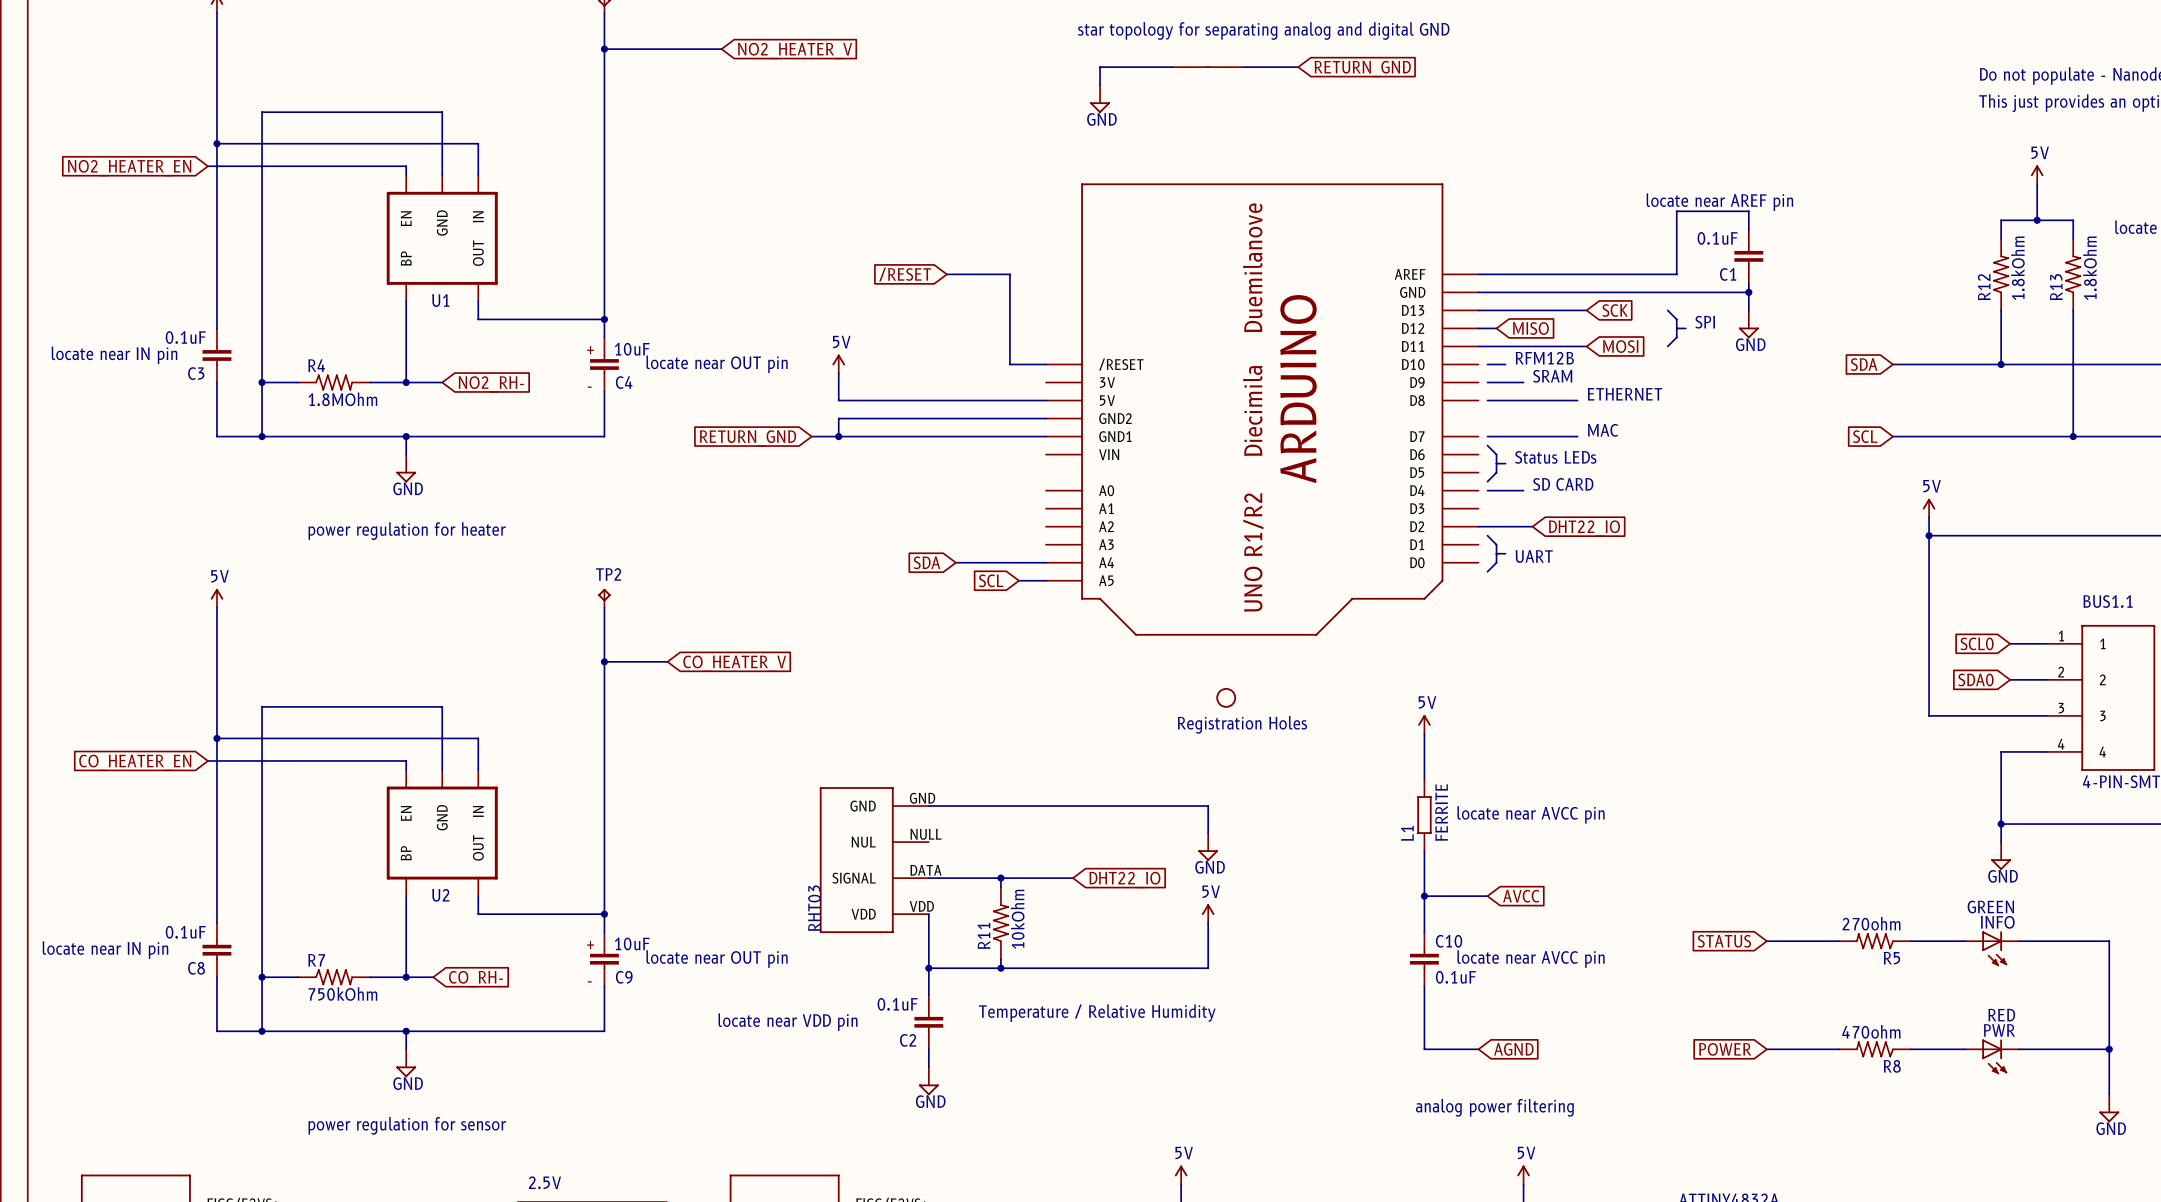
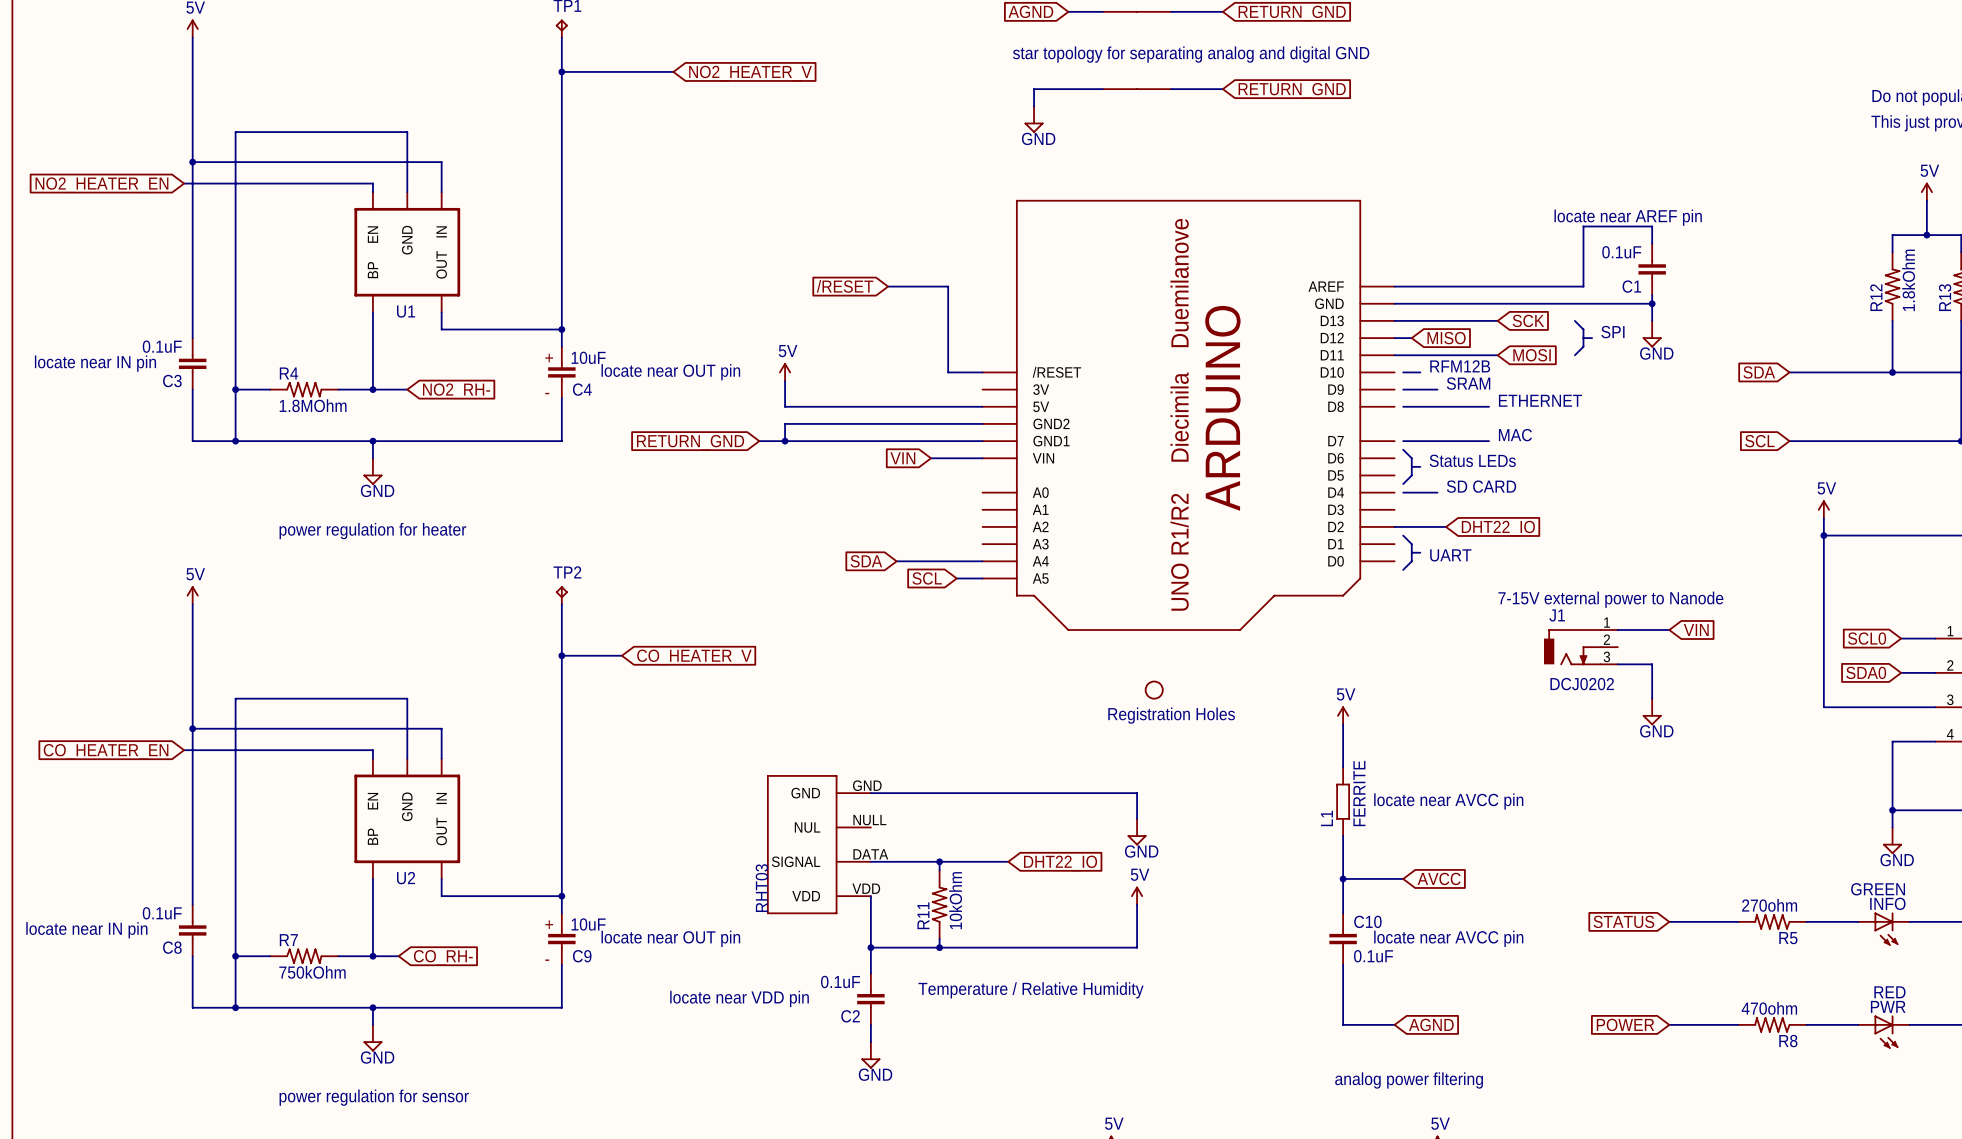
global label: none -> VIN (902, 458)
wire: none -> (931, 458) (982, 458)
text: none -> 7-15V external power to Nanode (1610, 599)
wire: none -> (1617, 629) (1669, 629)
global label: none -> VIN (1696, 629)
J1: none -> DCJ0202 (1580, 647)
wire: none -> (1617, 664) (1652, 664) (1652, 698)
power symbol: none -> GND (1652, 711)

